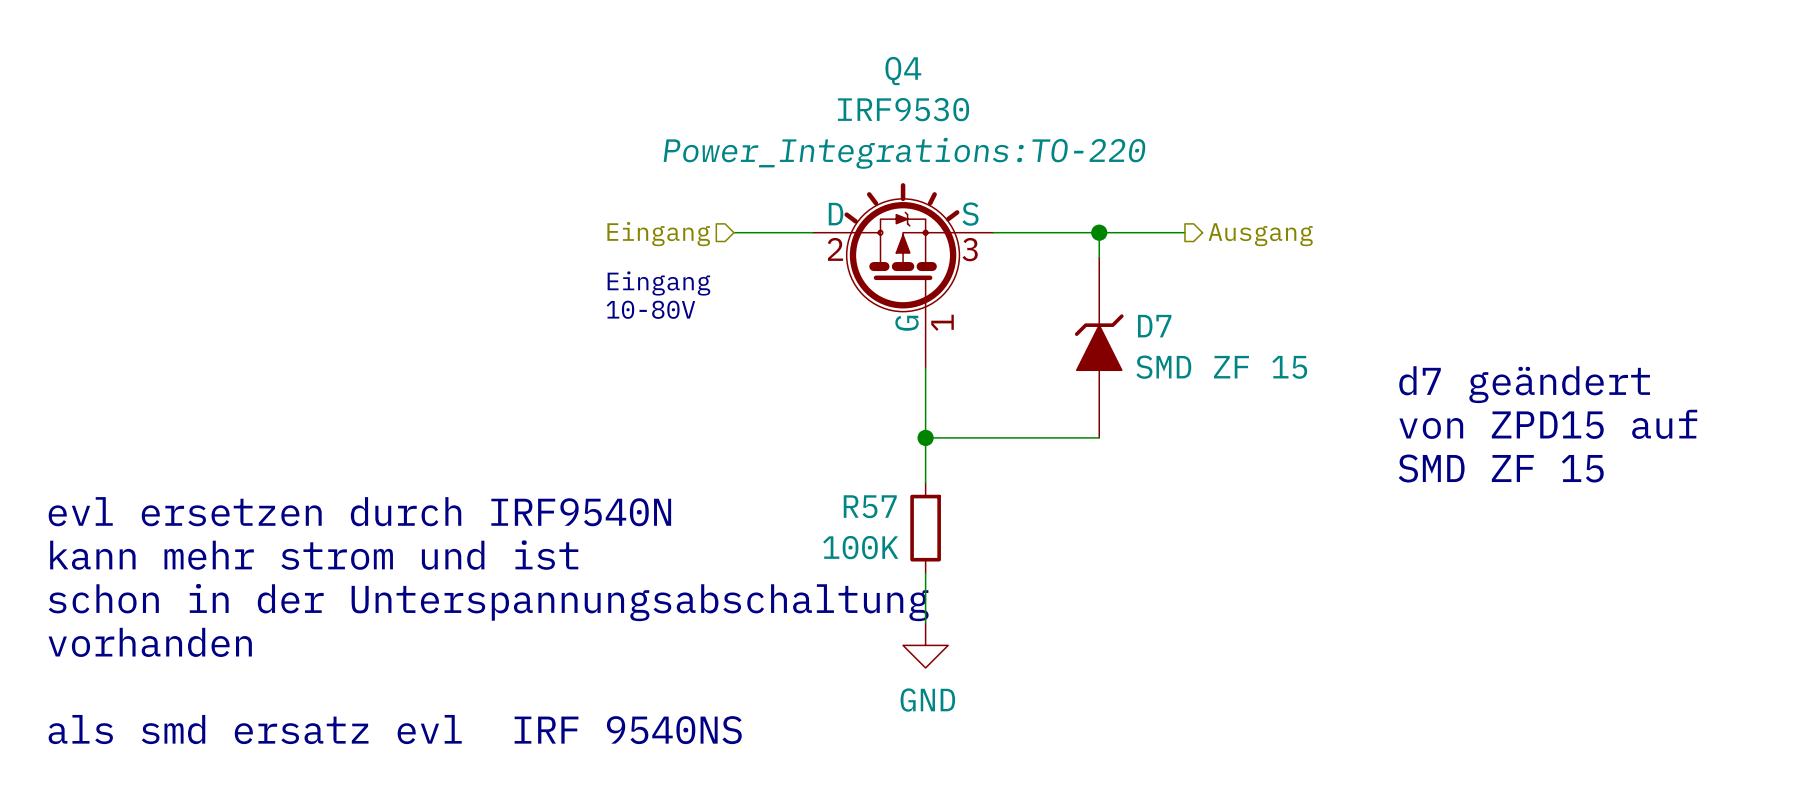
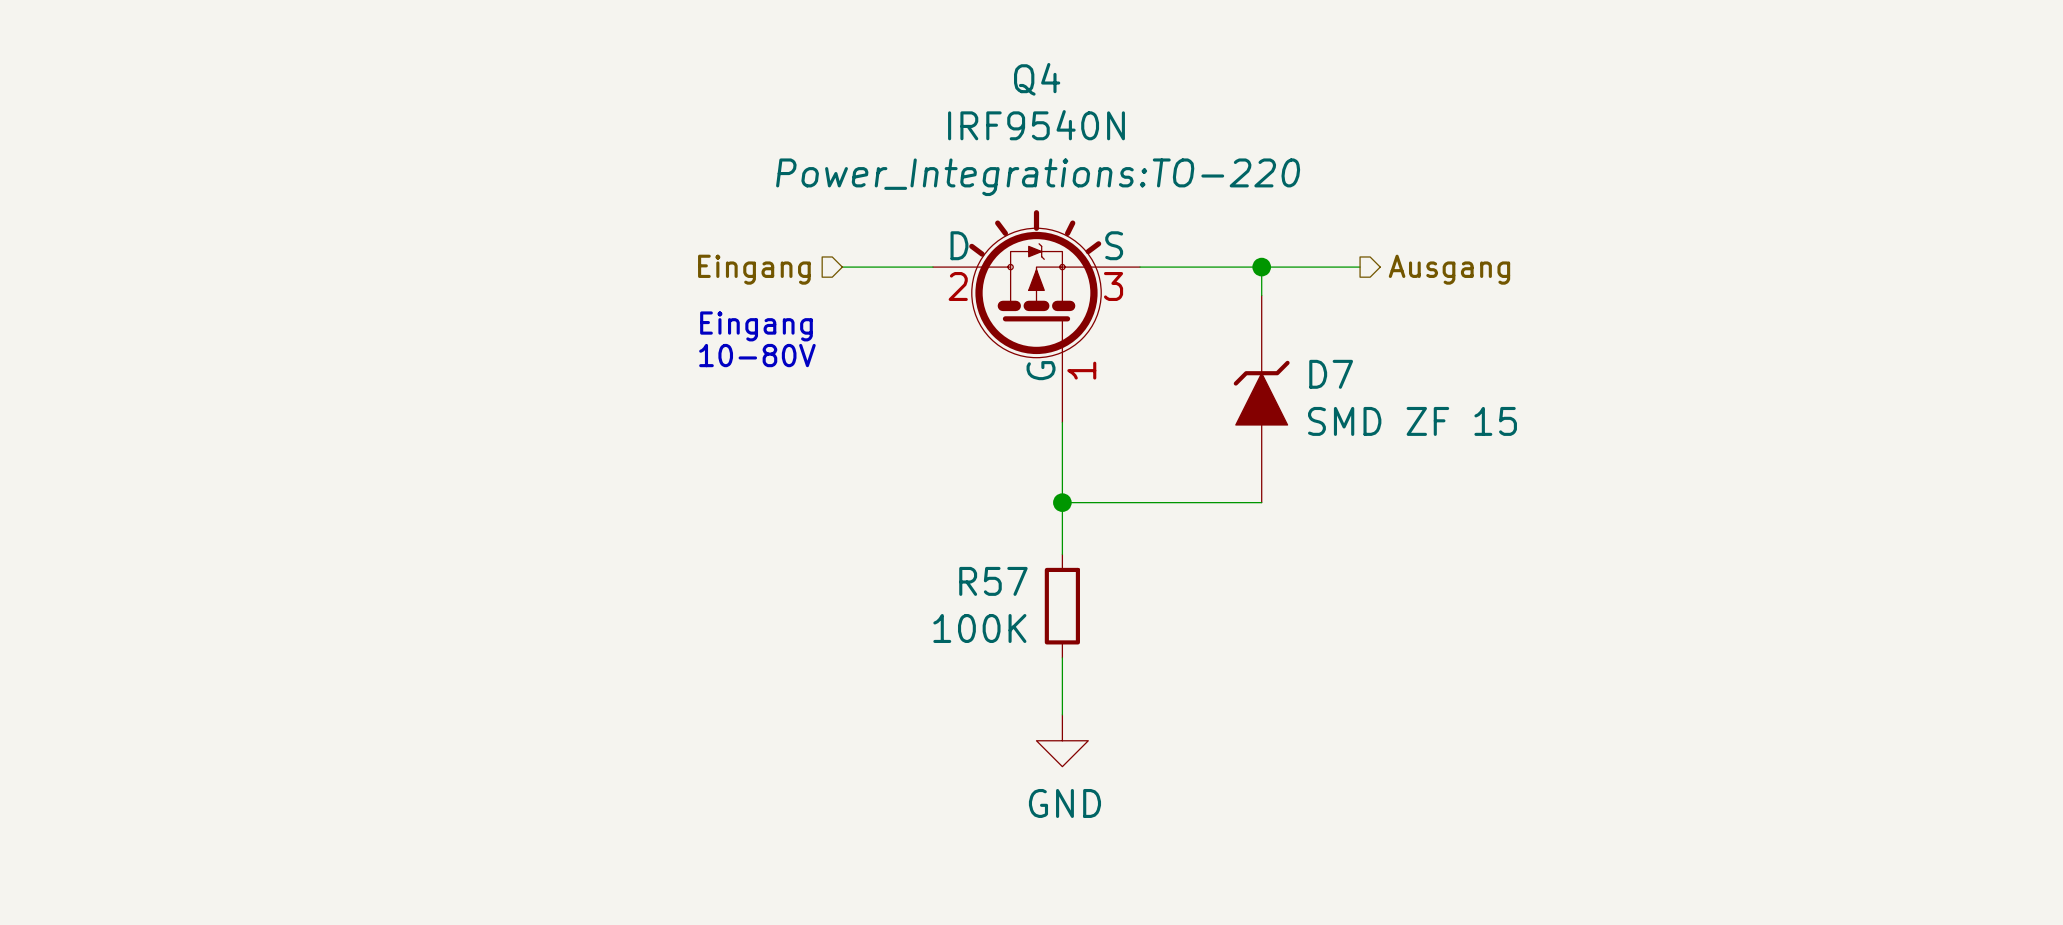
Q4 value: IRF9530 (903, 109) -> IRF9540N (1036, 125)
text: d7 geändert (1524, 384) -> none
text: von ZPD15 auf (1548, 424) -> none
text: SMD ZF 15 (1501, 468) -> none
text: evl ersetzen durch IRF9540N (359, 511) -> none
text: kann mehr strom und ist (314, 555) -> none
text: schon in der Unterspannungsabschaltung (488, 602) -> none
text: vorhanden (150, 642) -> none
text: als smd ersatz evl IRF 9540NS (395, 729) -> none

